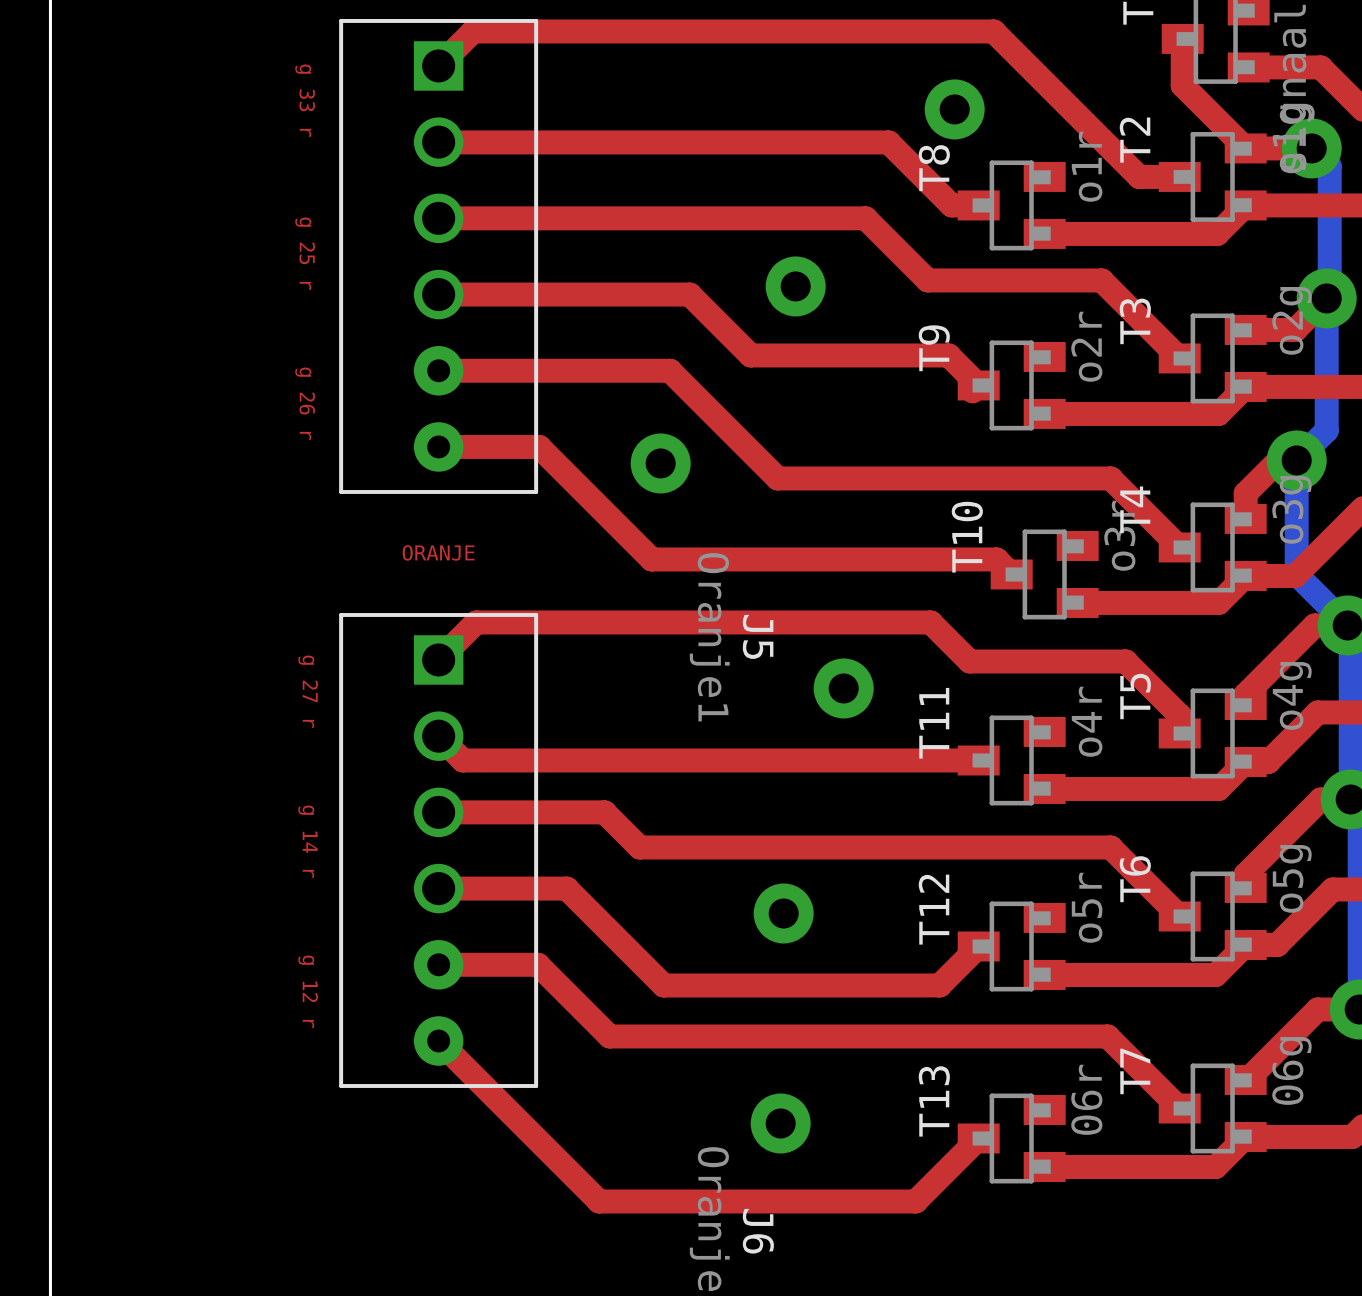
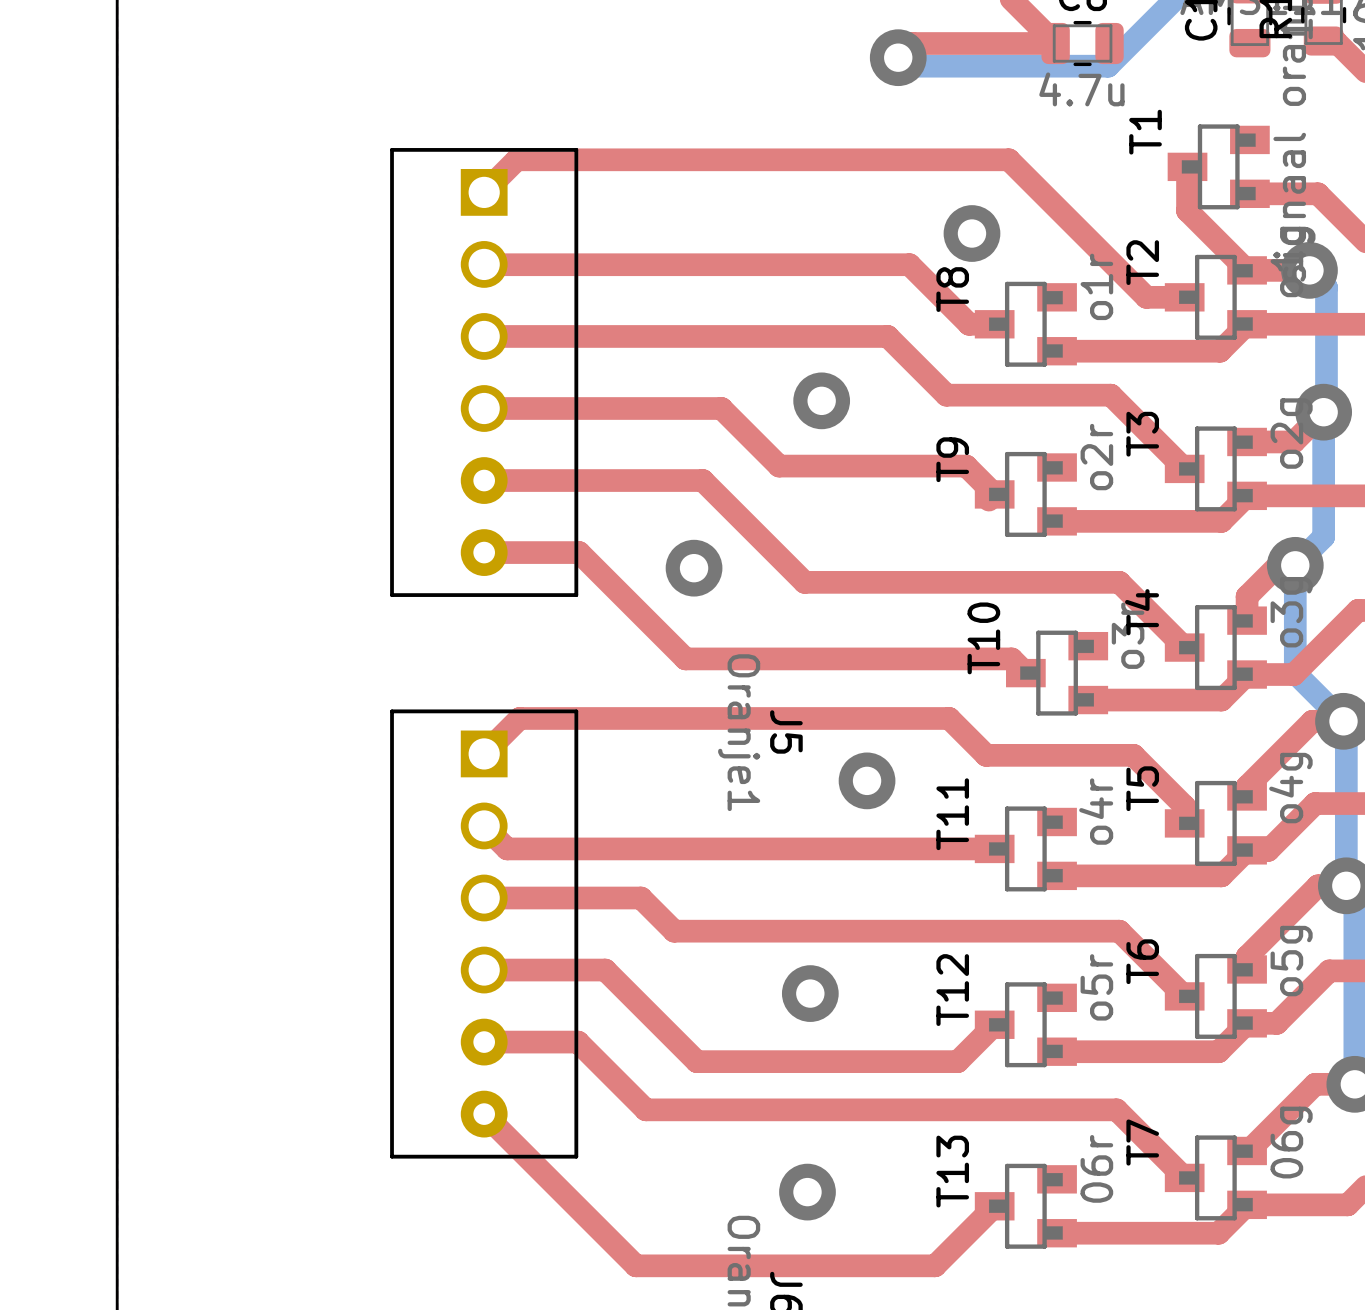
text: g 33 r (305, 100) -> none
text: g 25 r (305, 253) -> none
text: g 26 r (305, 403) -> none
text: ORANJE (438, 552) -> none
text: g 27 r (308, 691) -> none
text: g 14 r (308, 841) -> none
text: g 12 r (308, 991) -> none

